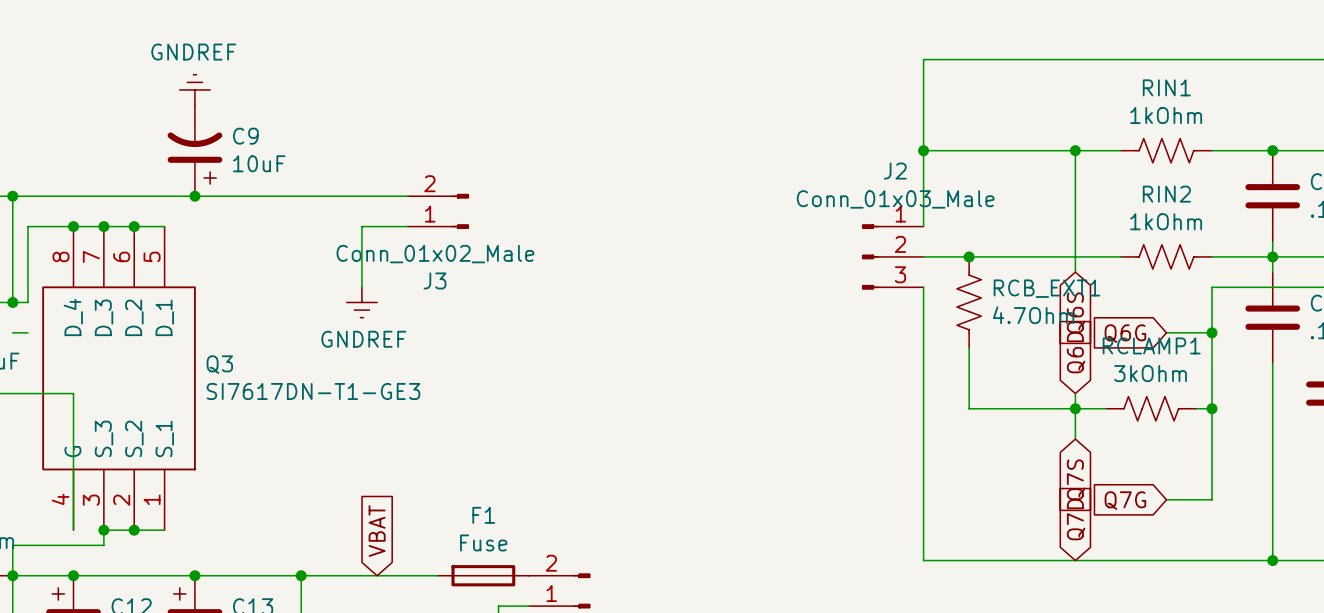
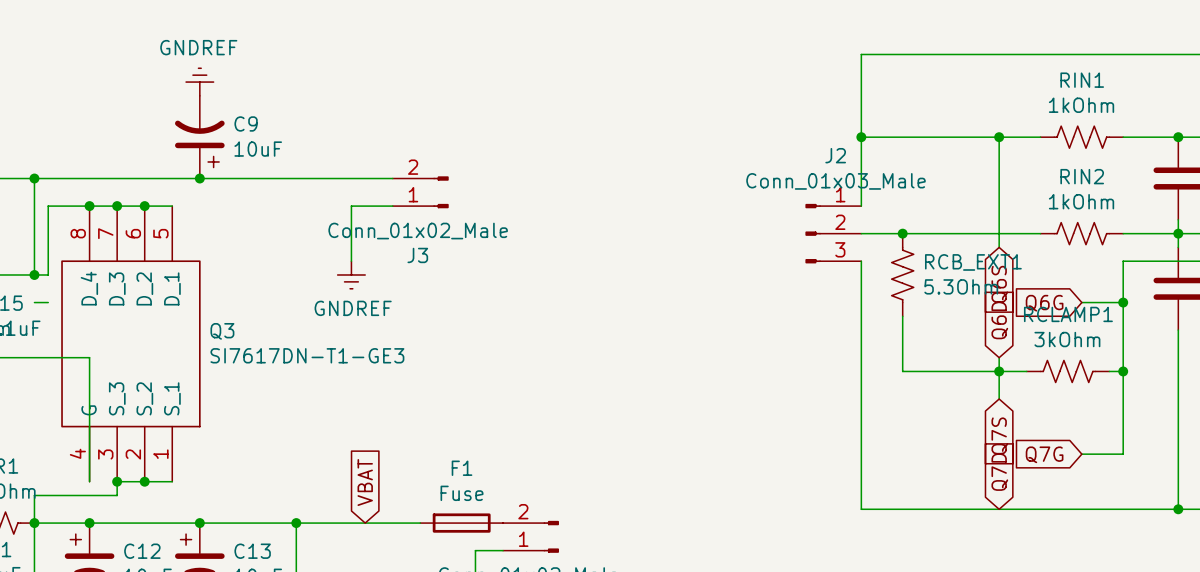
RCB_EXT1 value: 4.7Ohm (1033, 315) -> 5.3Ohm (961, 286)

